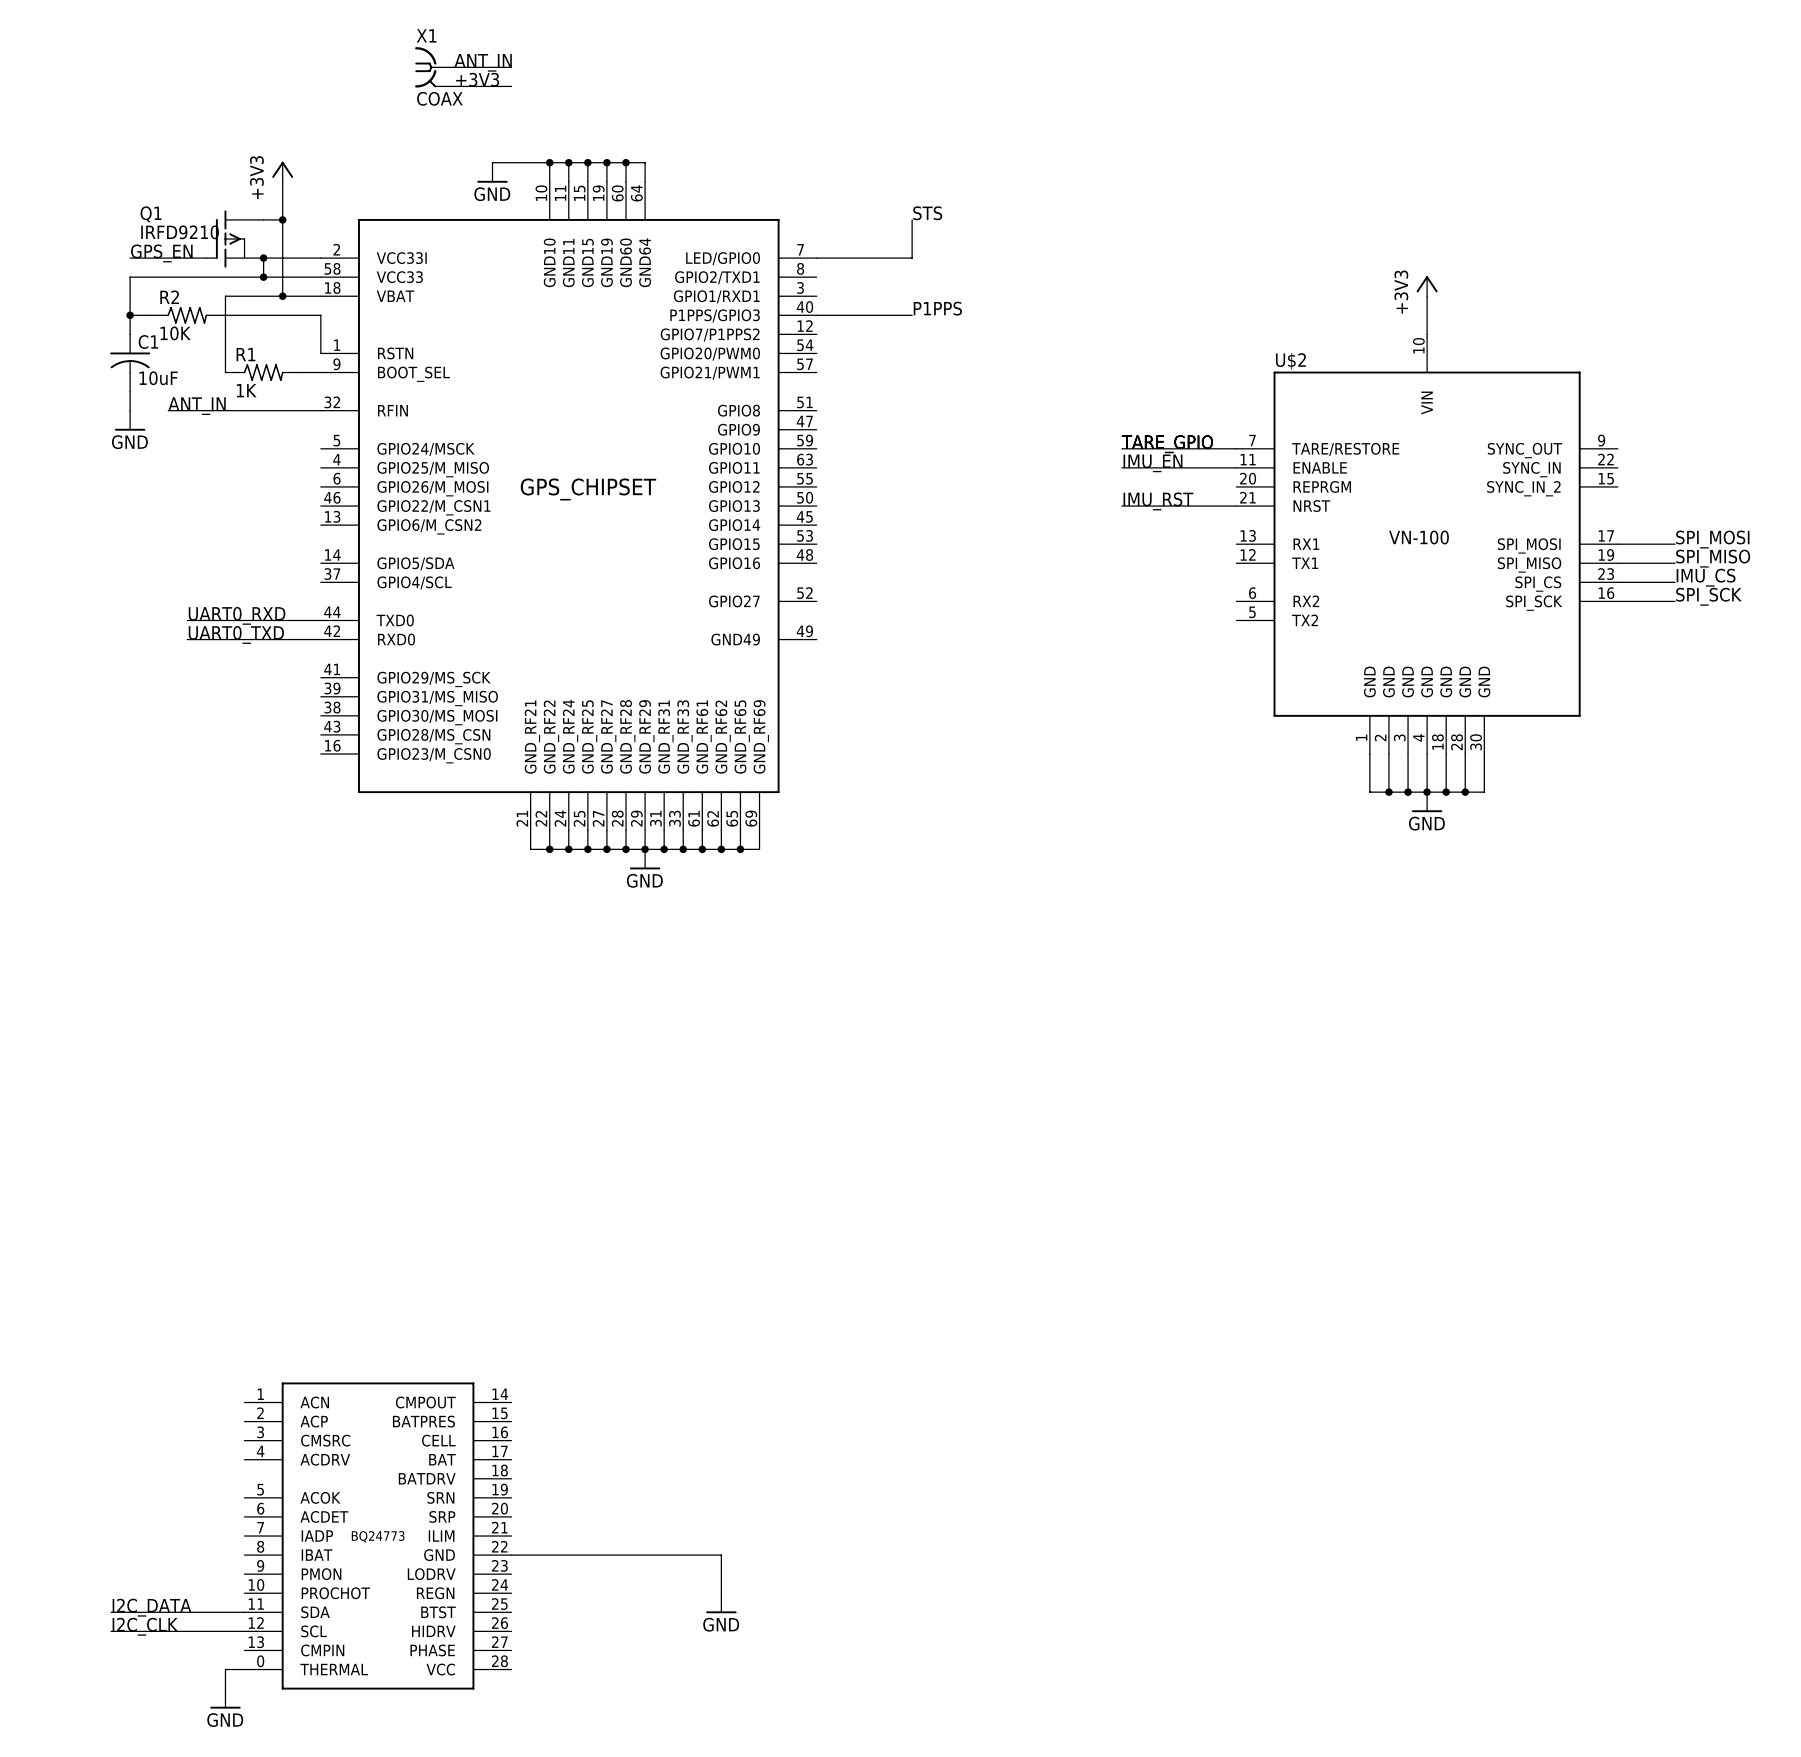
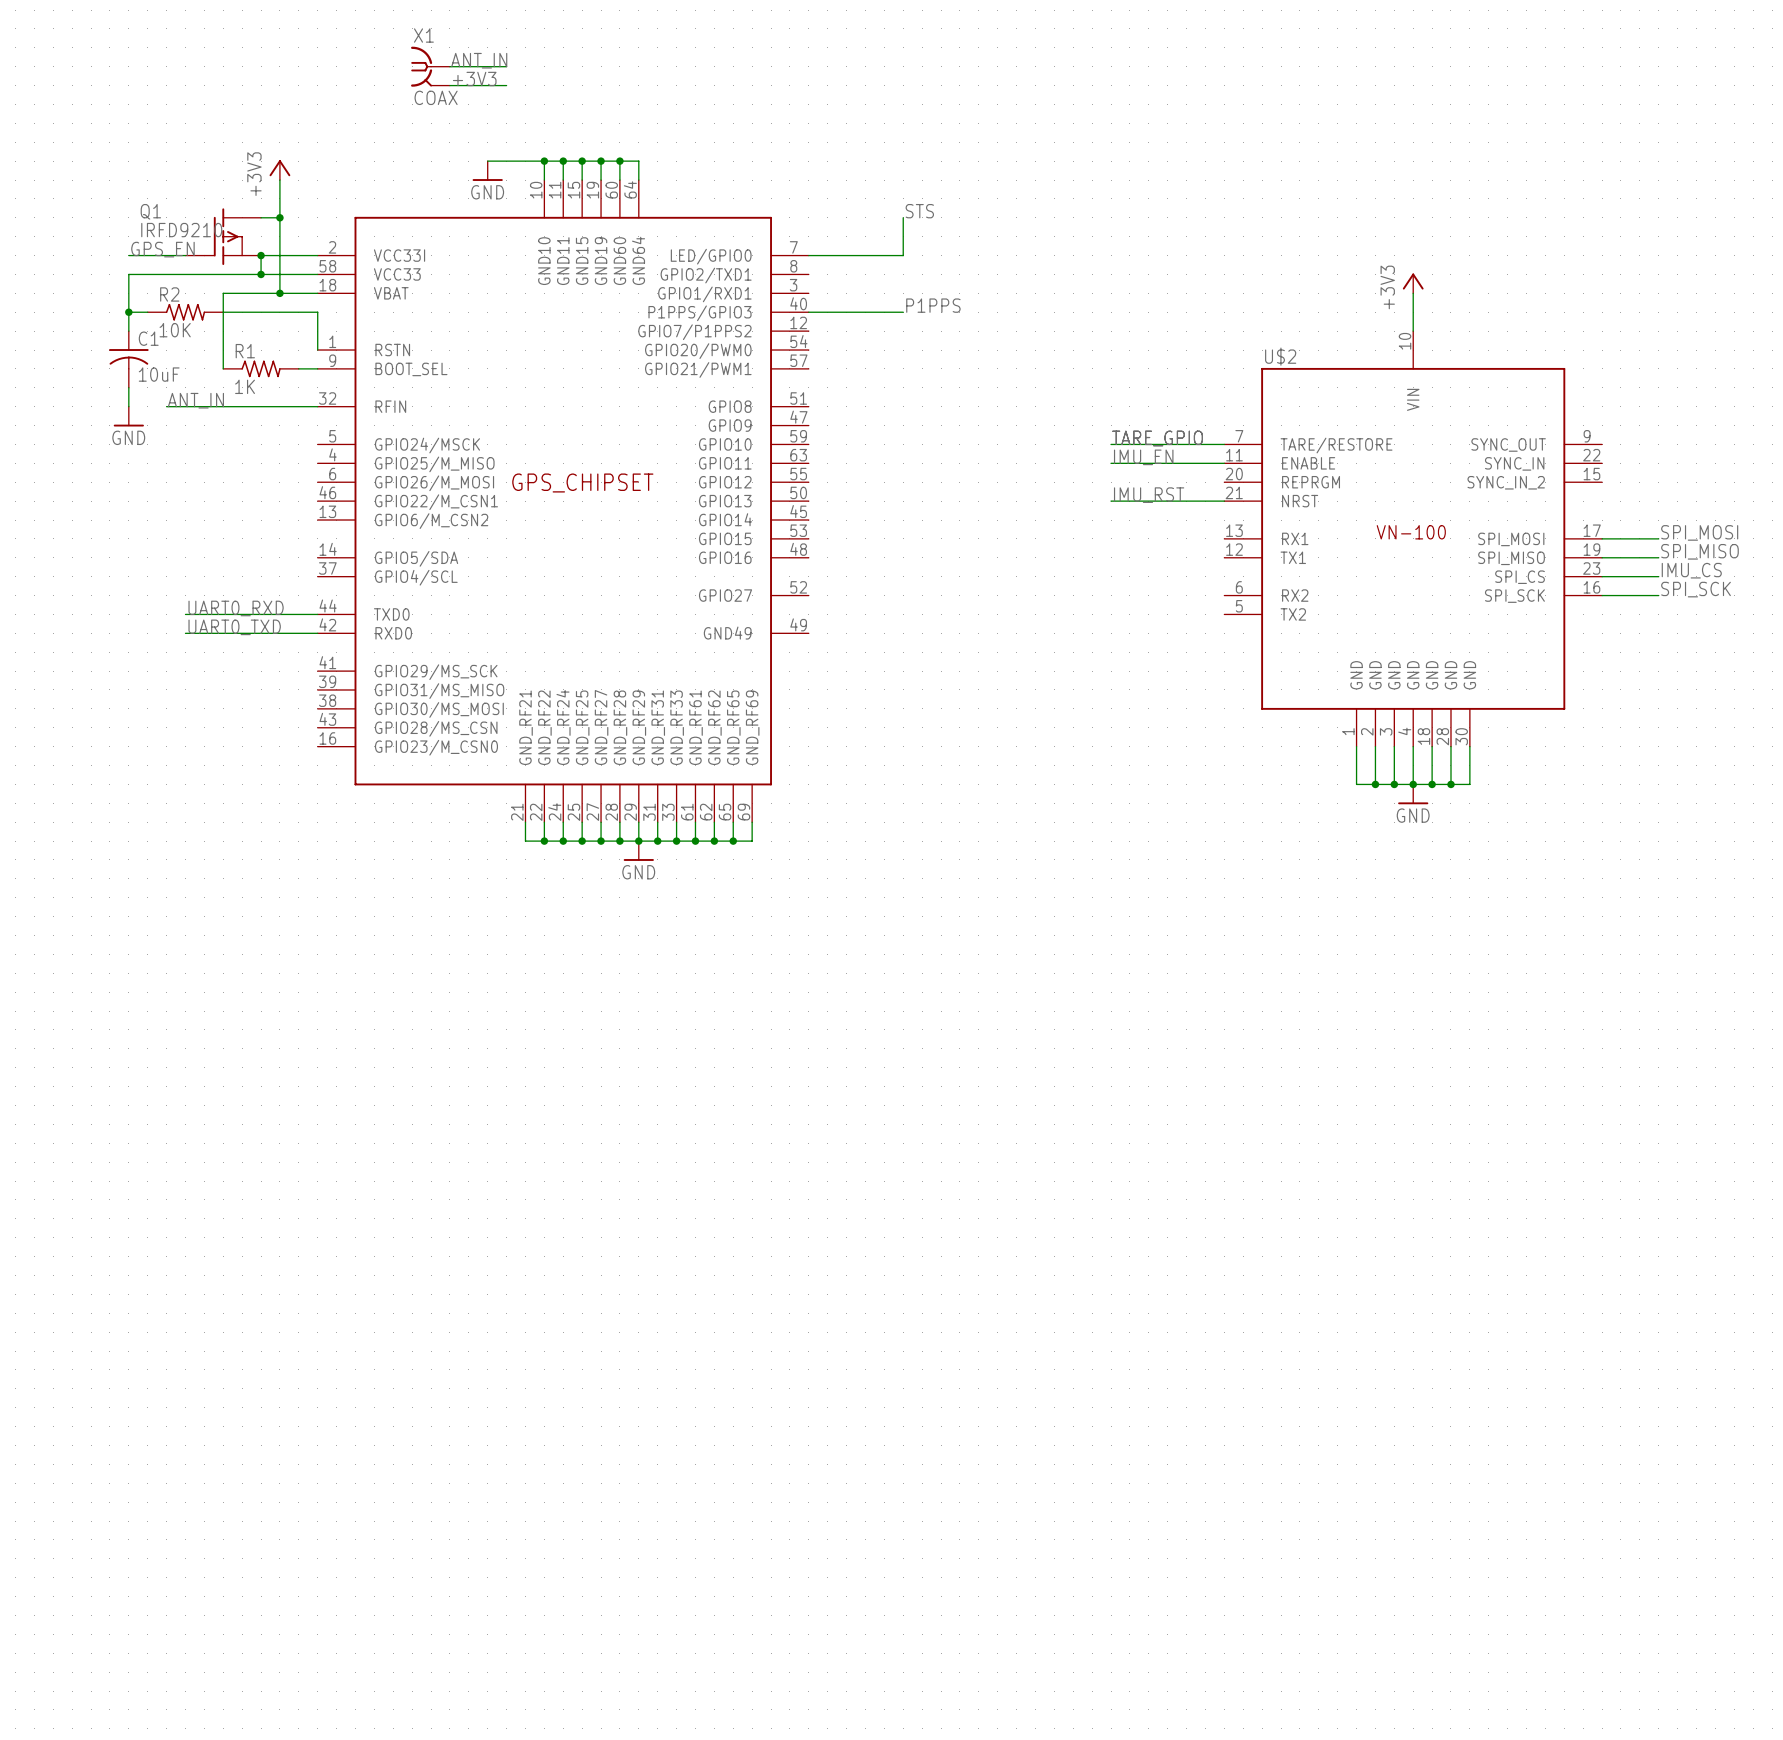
BQ24773: (378, 1536) -> none
wire: (511, 1555) (721, 1555) (721, 1593) -> none
power symbol: GND (721, 1603) -> none
label: I2C_DATA (151, 1607) -> none
wire: (111, 1612) (244, 1612) -> none
label: I2C_CLK (145, 1626) -> none
wire: (111, 1631) (244, 1631) -> none
wire: (244, 1669) (225, 1669) (225, 1688) -> none
power symbol: GND (225, 1698) -> none

